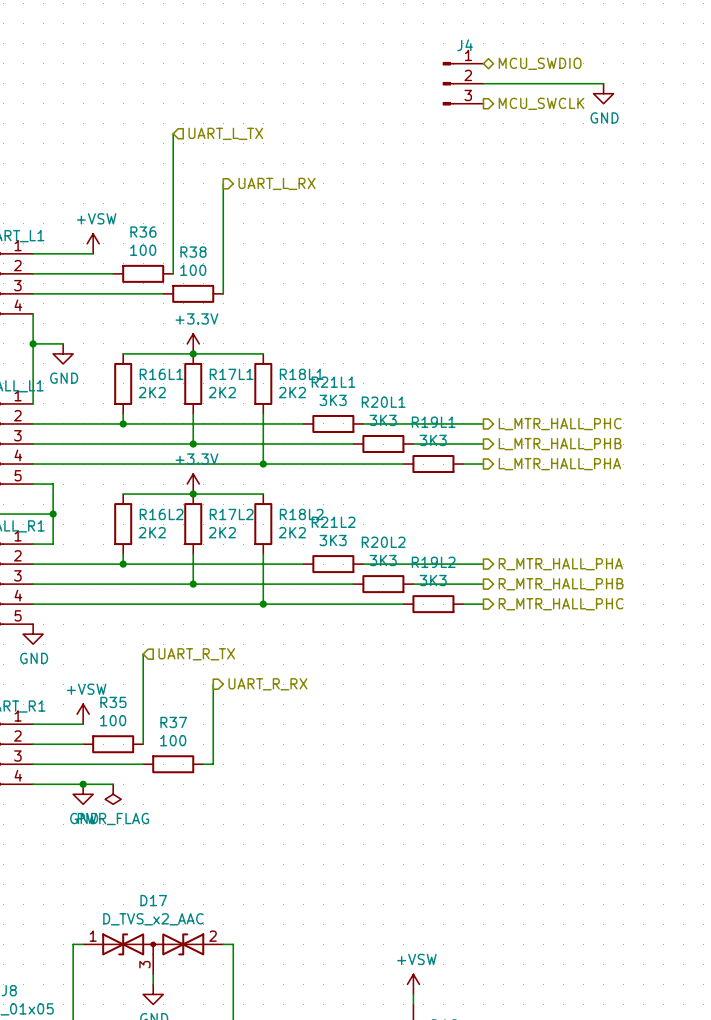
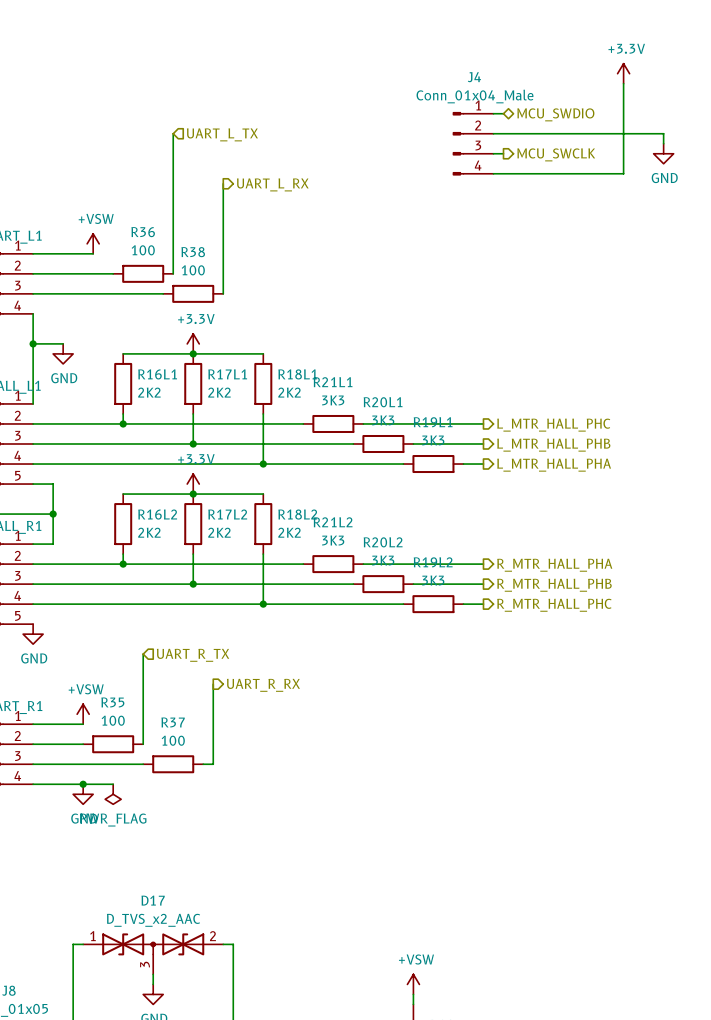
J4 name position: J4 (465, 45) -> J4 (474, 77)
J4 symbol: [442, 62, 484, 106] -> [452, 112, 494, 176]
hierarchical label position: MCU_SWDIO (540, 63) -> MCU_SWDIO (555, 114)
power symbol: none -> +3.3V (623, 73)
wire: (483, 83) (603, 83) -> none
wire: none -> (623, 83) (623, 173) (493, 173)
power symbol position: GND (603, 93) -> GND (663, 153)
J4 value: none -> Conn_01x04_Male (475, 96)
hierarchical label position: MCU_SWCLK (541, 103) -> MCU_SWCLK (556, 154)
wire: none -> (493, 113) (503, 113)
wire: none -> (493, 133) (663, 133) (663, 143)
wire: none -> (493, 153) (503, 153)

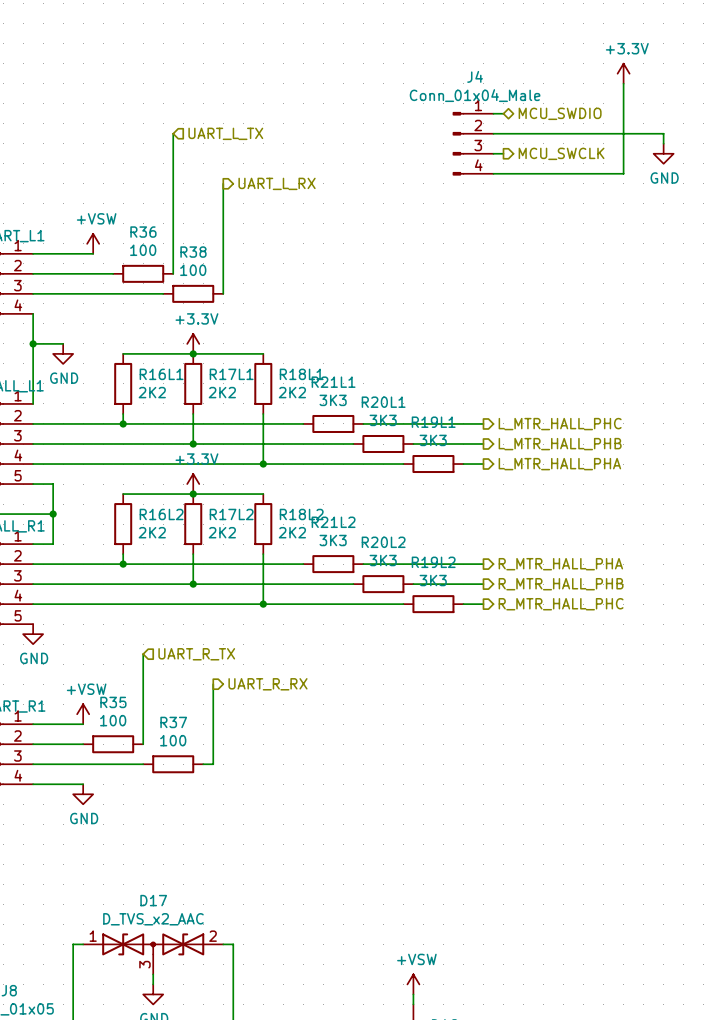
wire: (83, 784) (113, 784) -> none
junction: (83, 784) -> none
power symbol: PWR_FLAG (113, 794) -> none

